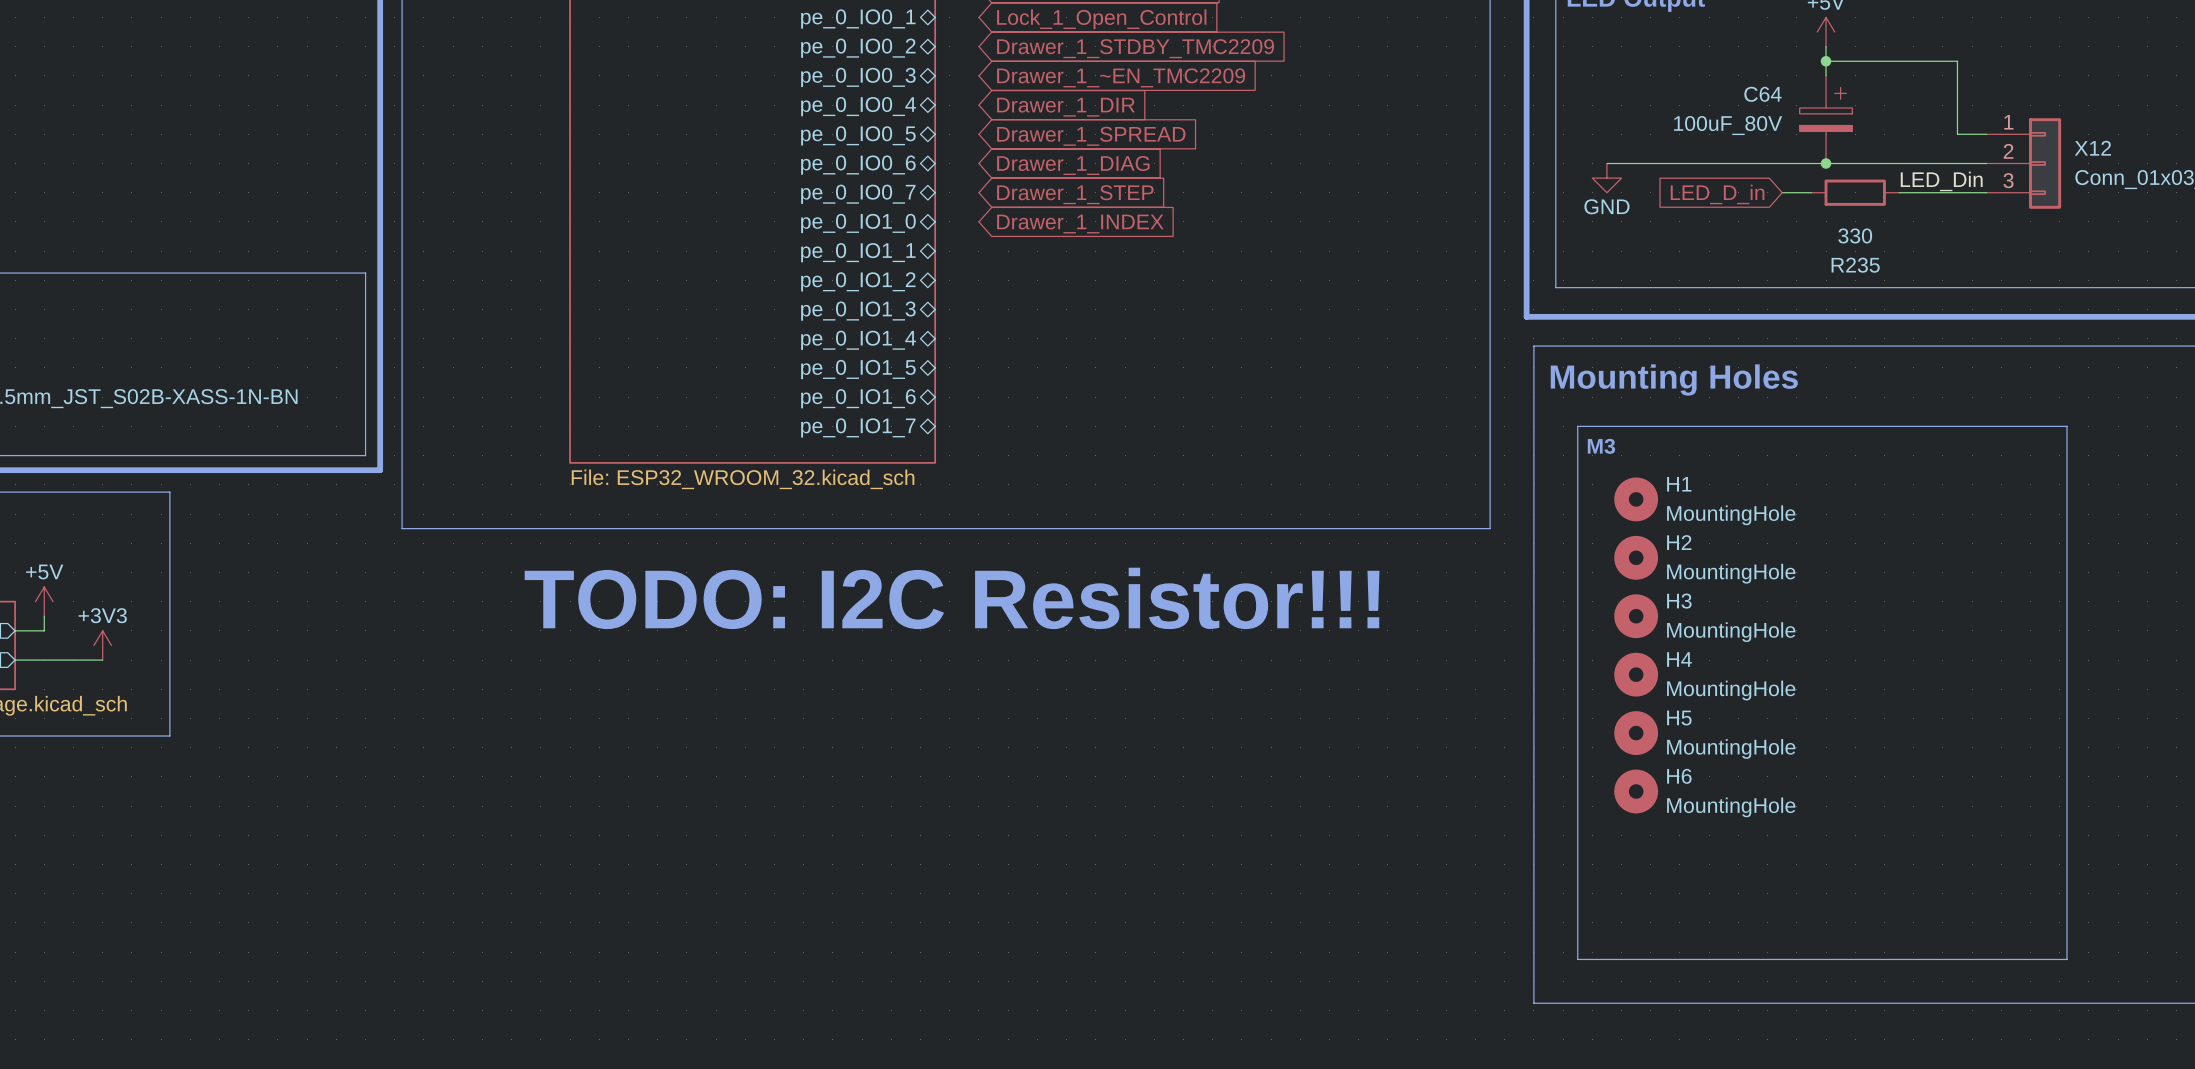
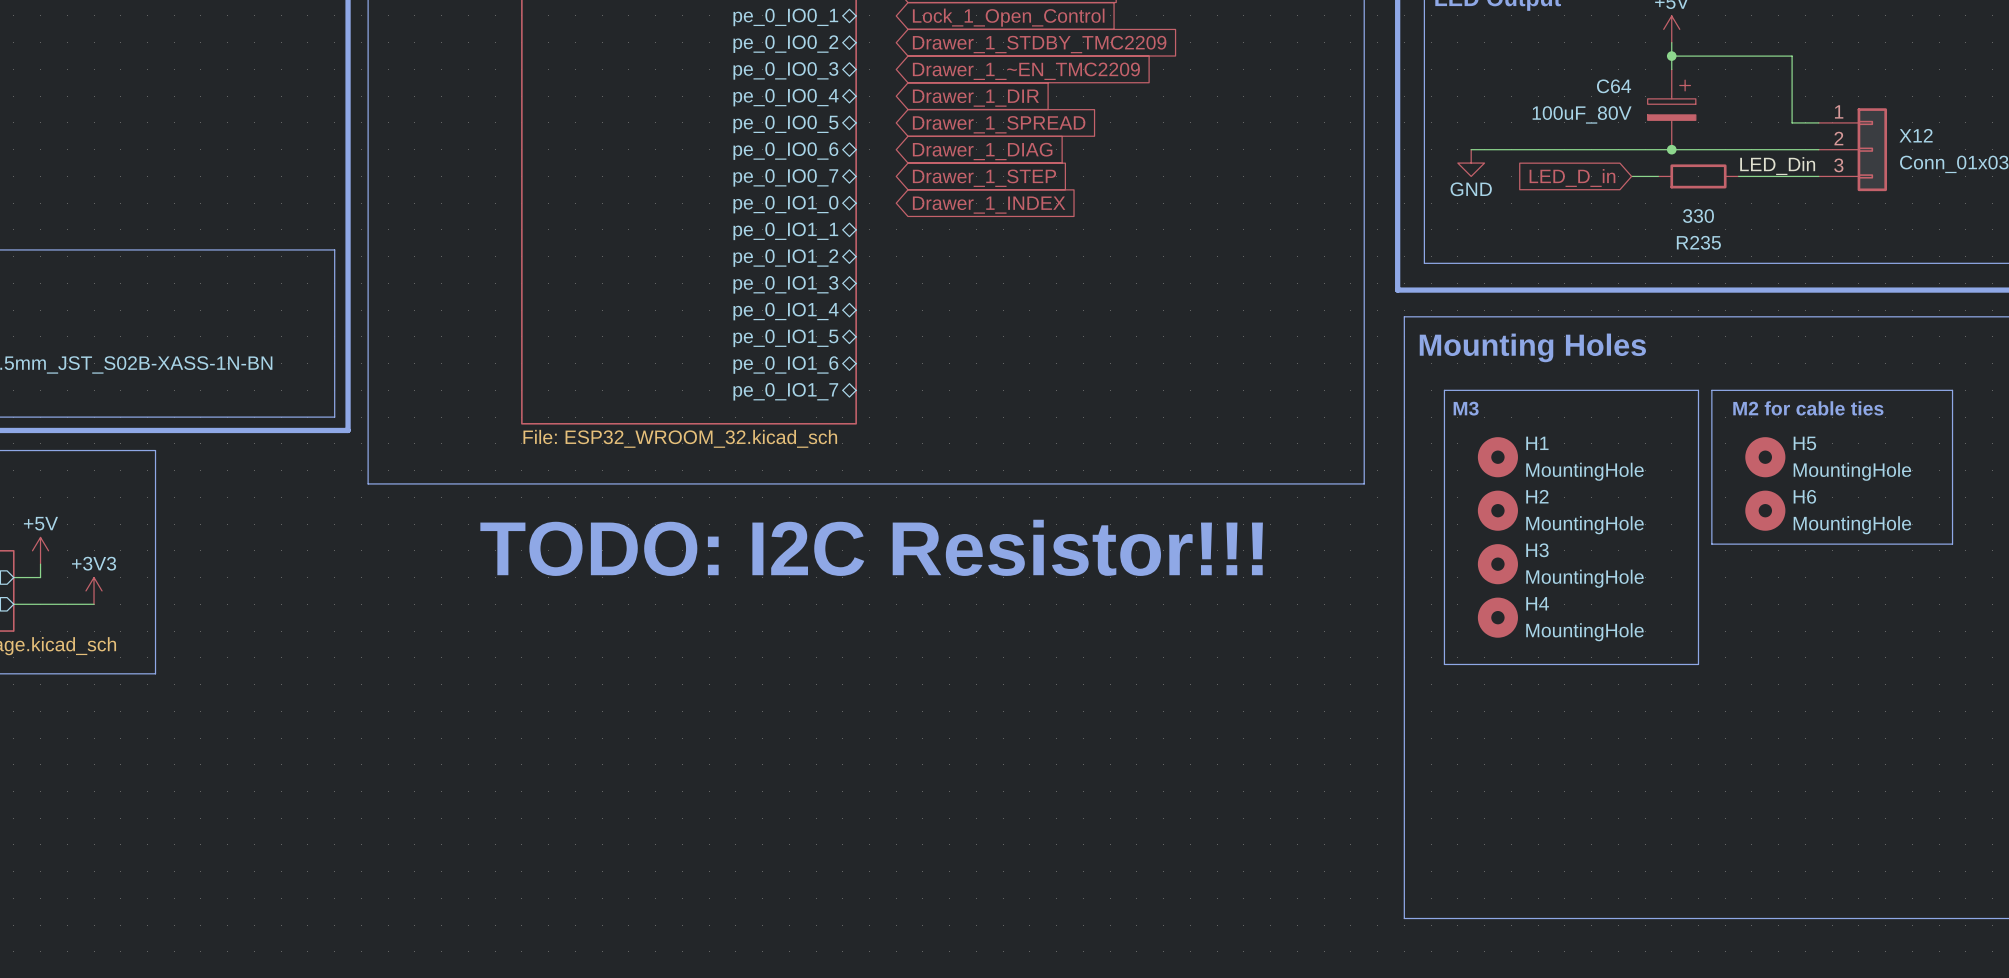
line: (1855, 426) (1869, 426) -> (1892, 390) (1952, 390) (1952, 544) (1711, 544) (1711, 390)
line: (2066, 426) (2066, 959) (1577, 959) (1577, 725) -> (1698, 390) (1698, 664) (1444, 664)
text: none -> M2 for cable ties (1808, 408)
H5 position: (1636, 733) -> (1765, 457)
H6 position: (1636, 791) -> (1765, 510)

